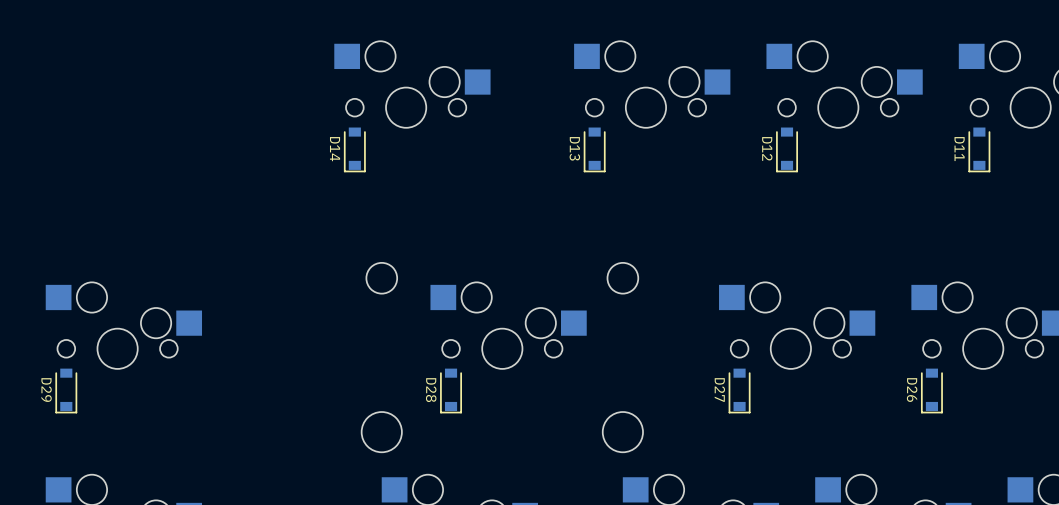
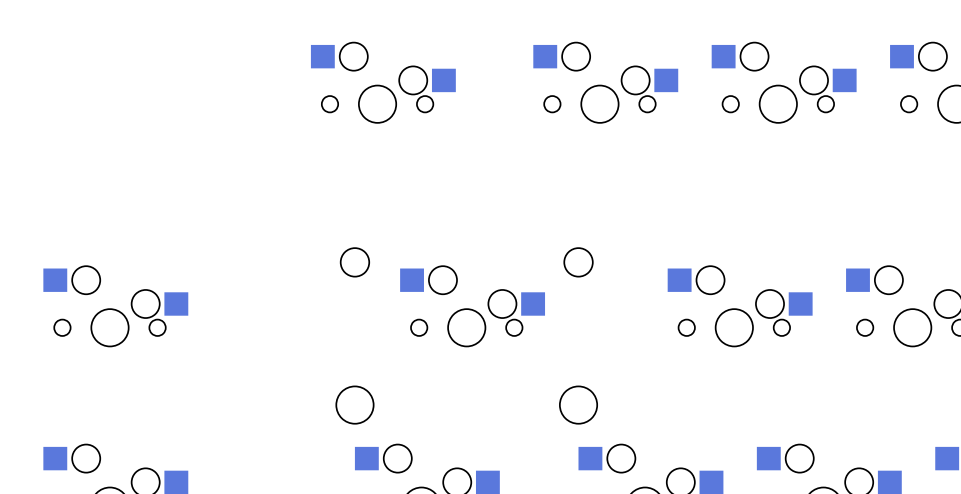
D14: (354, 149) -> none
D13: (594, 149) -> none
D12: (787, 149) -> none
D11: (979, 149) -> none
D29: (66, 390) -> none
D28: (451, 390) -> none
D27: (739, 390) -> none
D26: (931, 390) -> none

